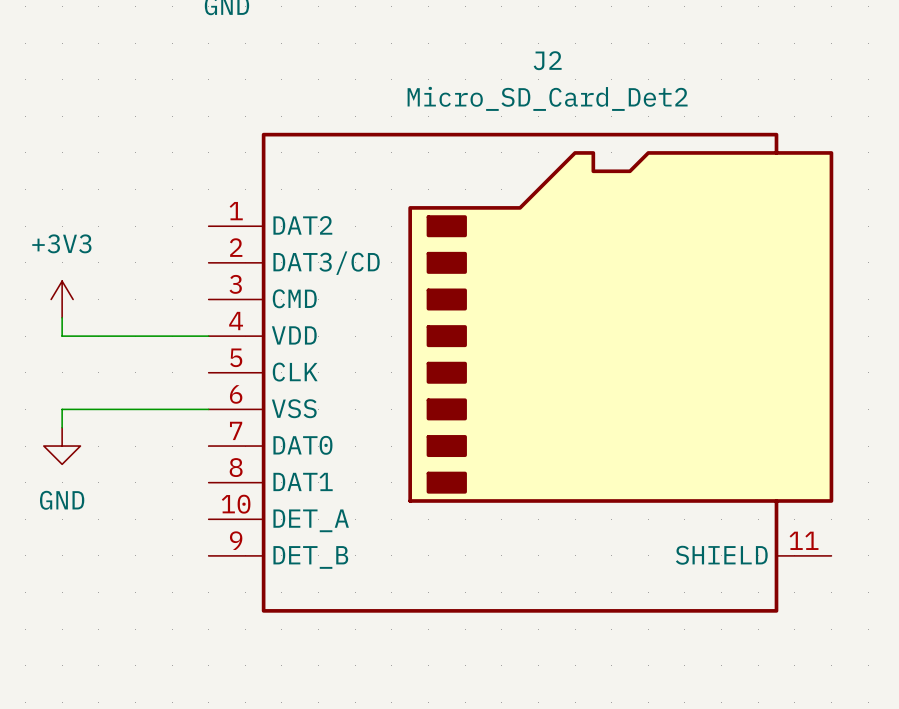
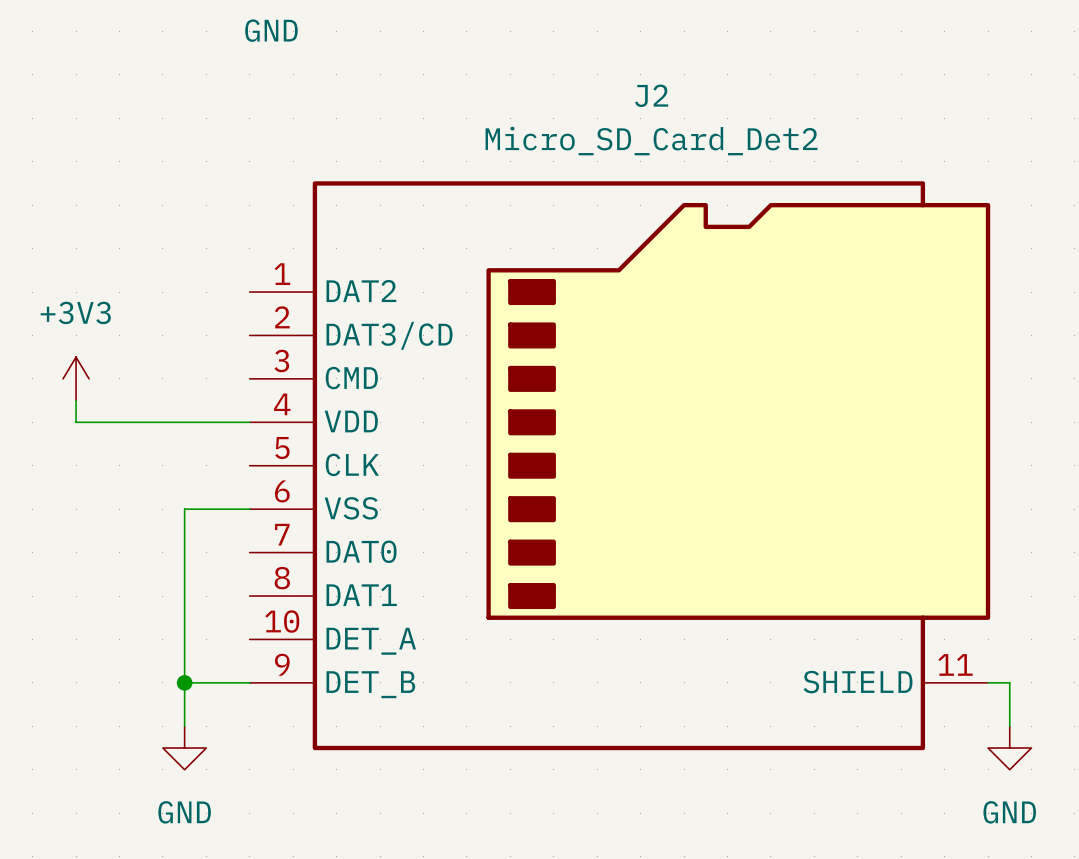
wire: (153, 409) (62, 409) (62, 427) -> (184, 509) (184, 726)
power symbol position: GND (62, 446) -> GND (184, 748)
wire: none -> (184, 682) (249, 682)
junction: none -> (184, 682)
wire: none -> (988, 682) (1009, 682) (1009, 726)
power symbol: none -> GND (1009, 748)

